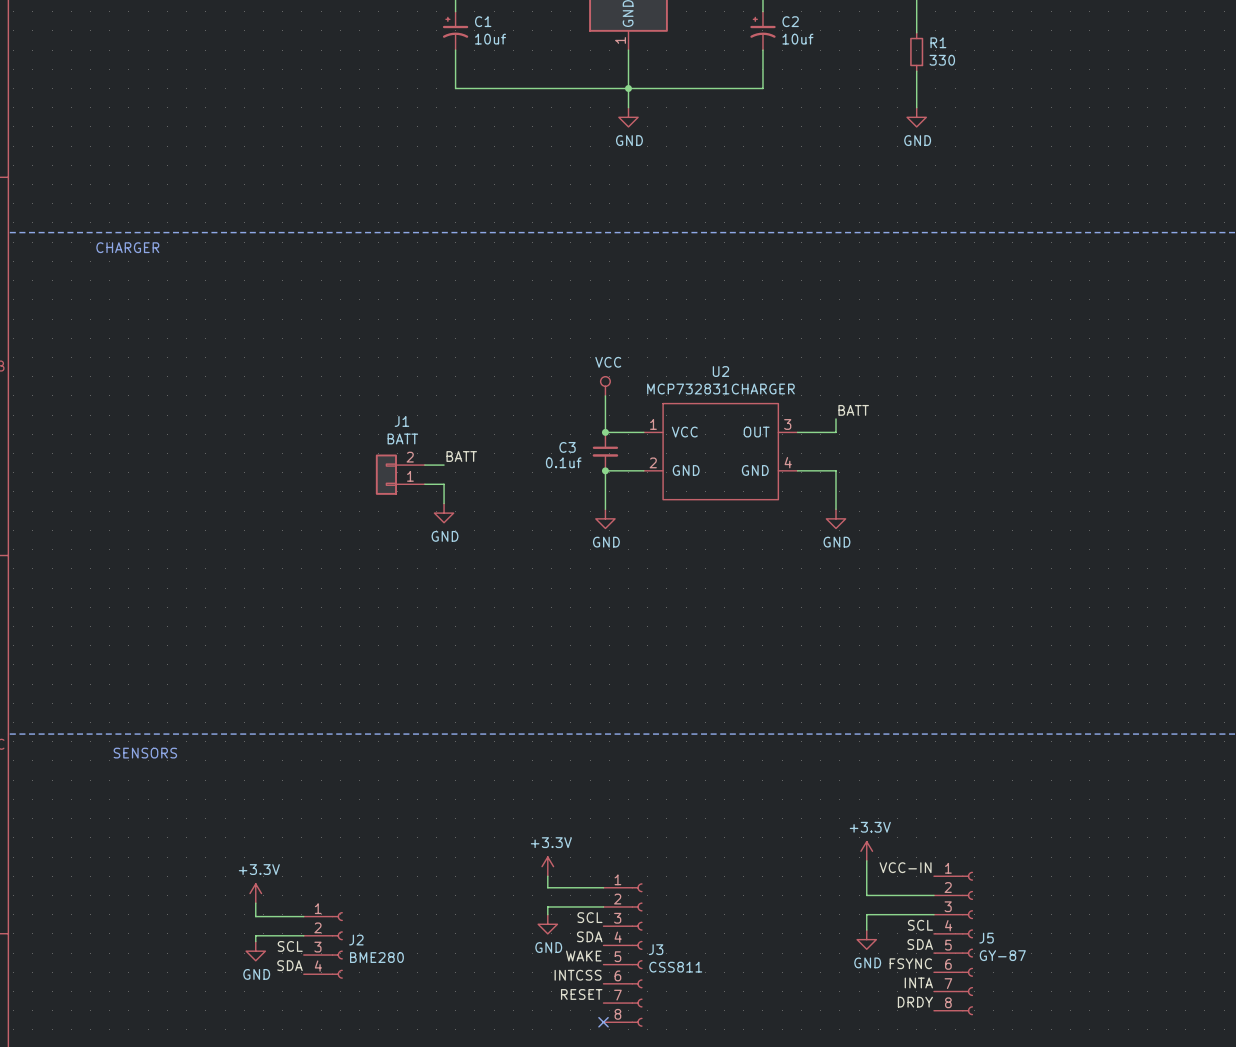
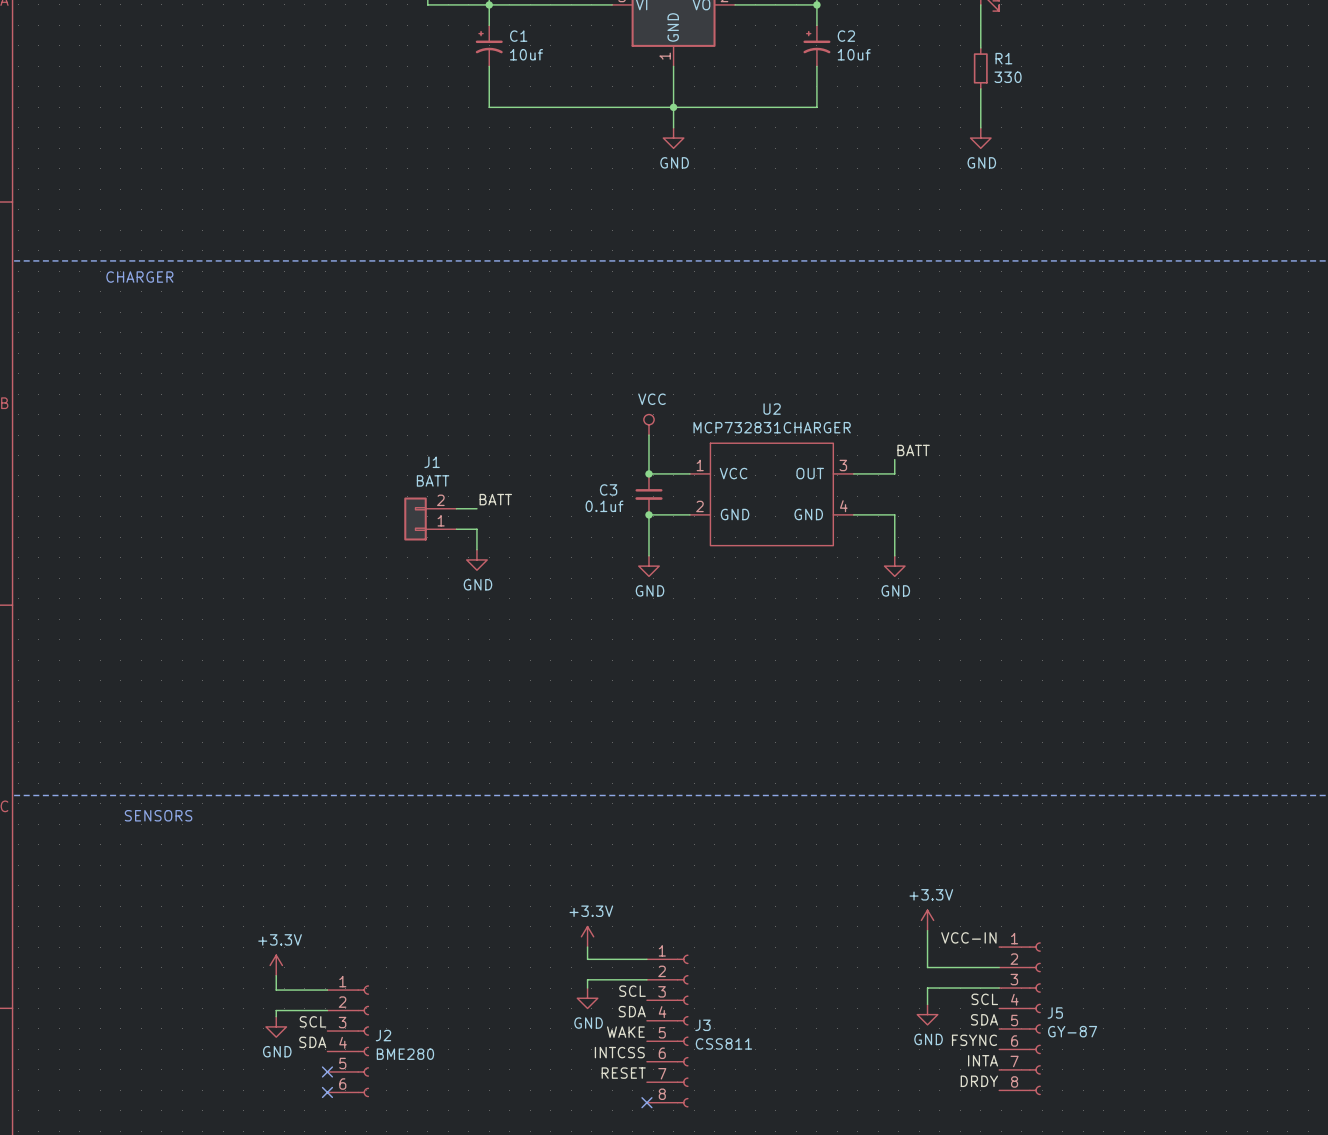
J2 symbol: [303, 912, 343, 979] -> [327, 985, 370, 1098]
no-connect mark: none -> (327, 1071)
no-connect mark: none -> (327, 1092)

